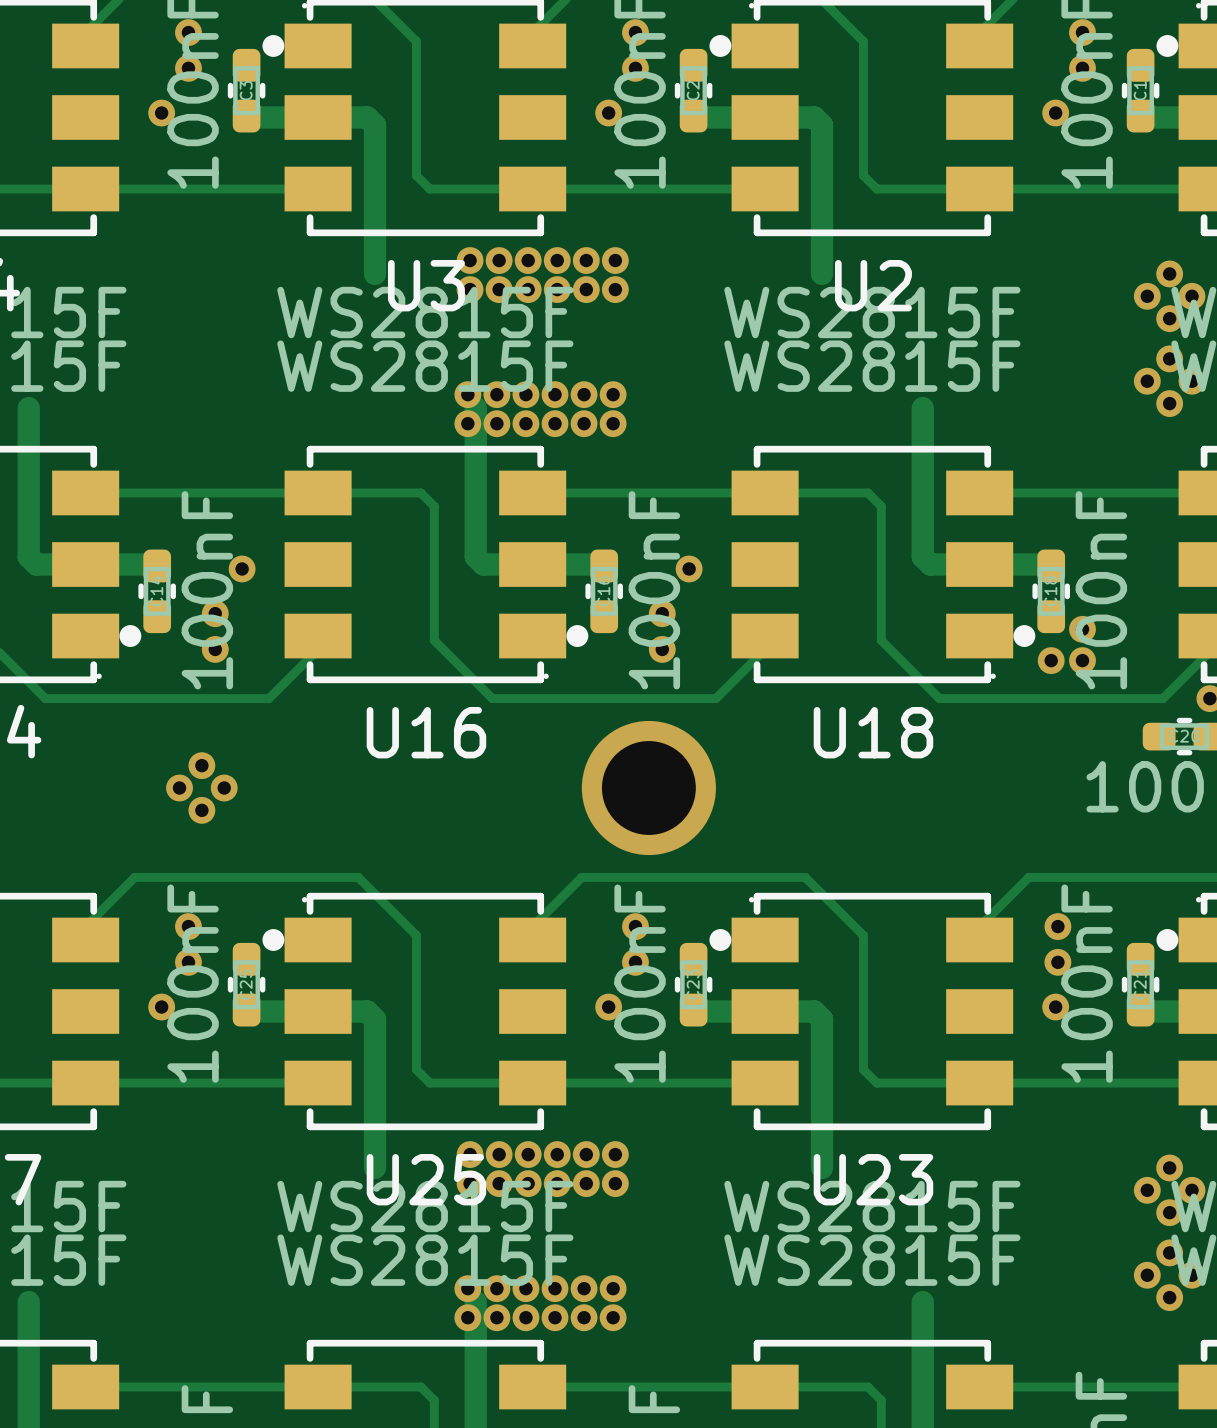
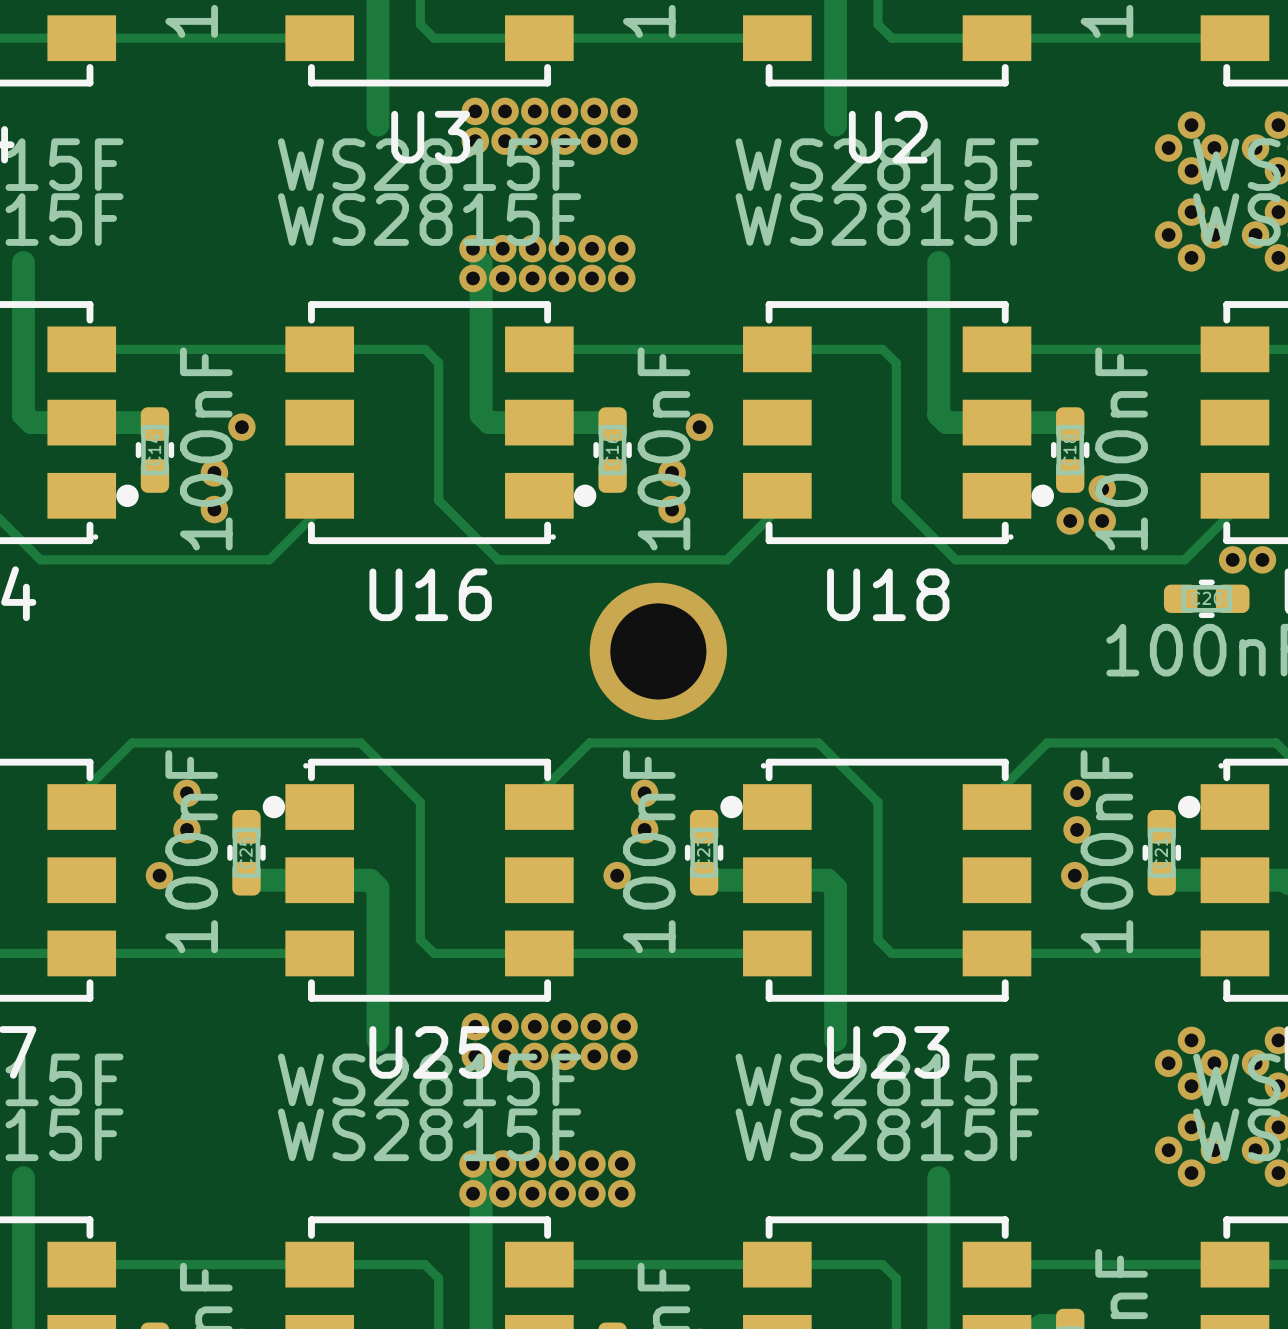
via: (201, 765) -> none
via: (179, 788) -> none
via: (224, 788) -> none
via: (201, 810) -> none

